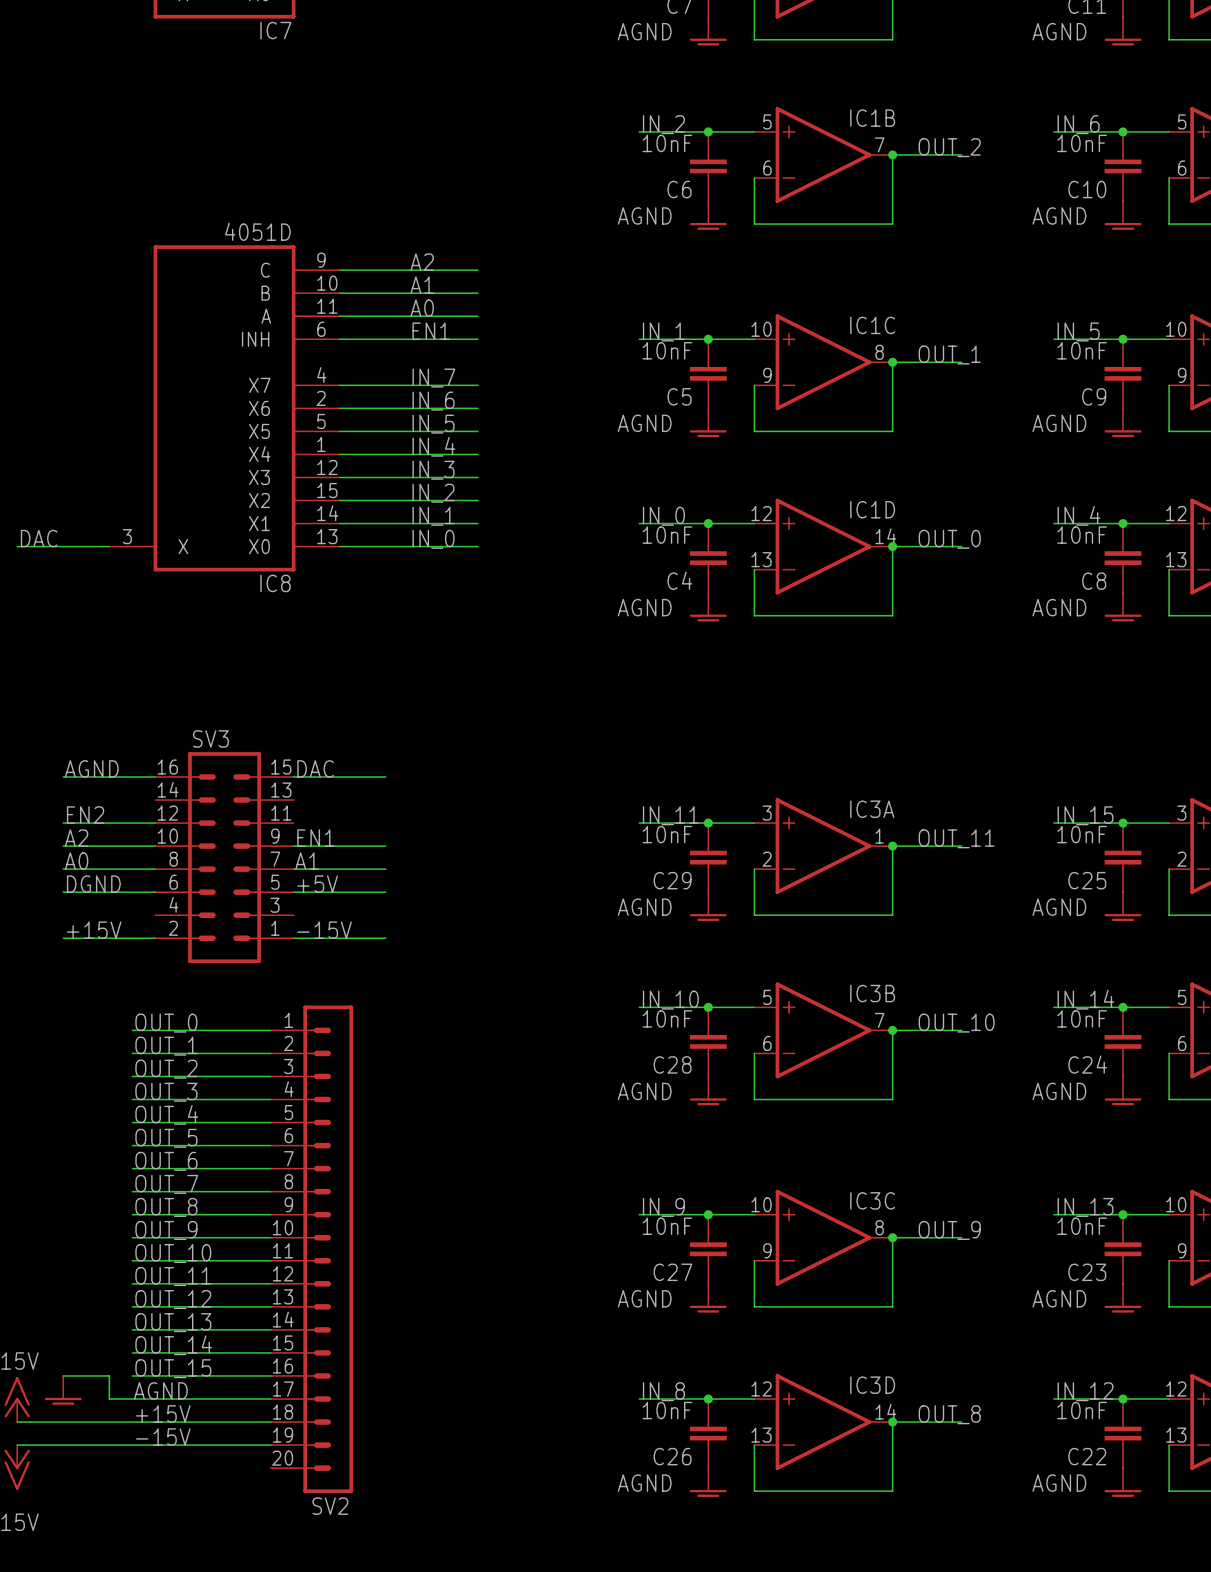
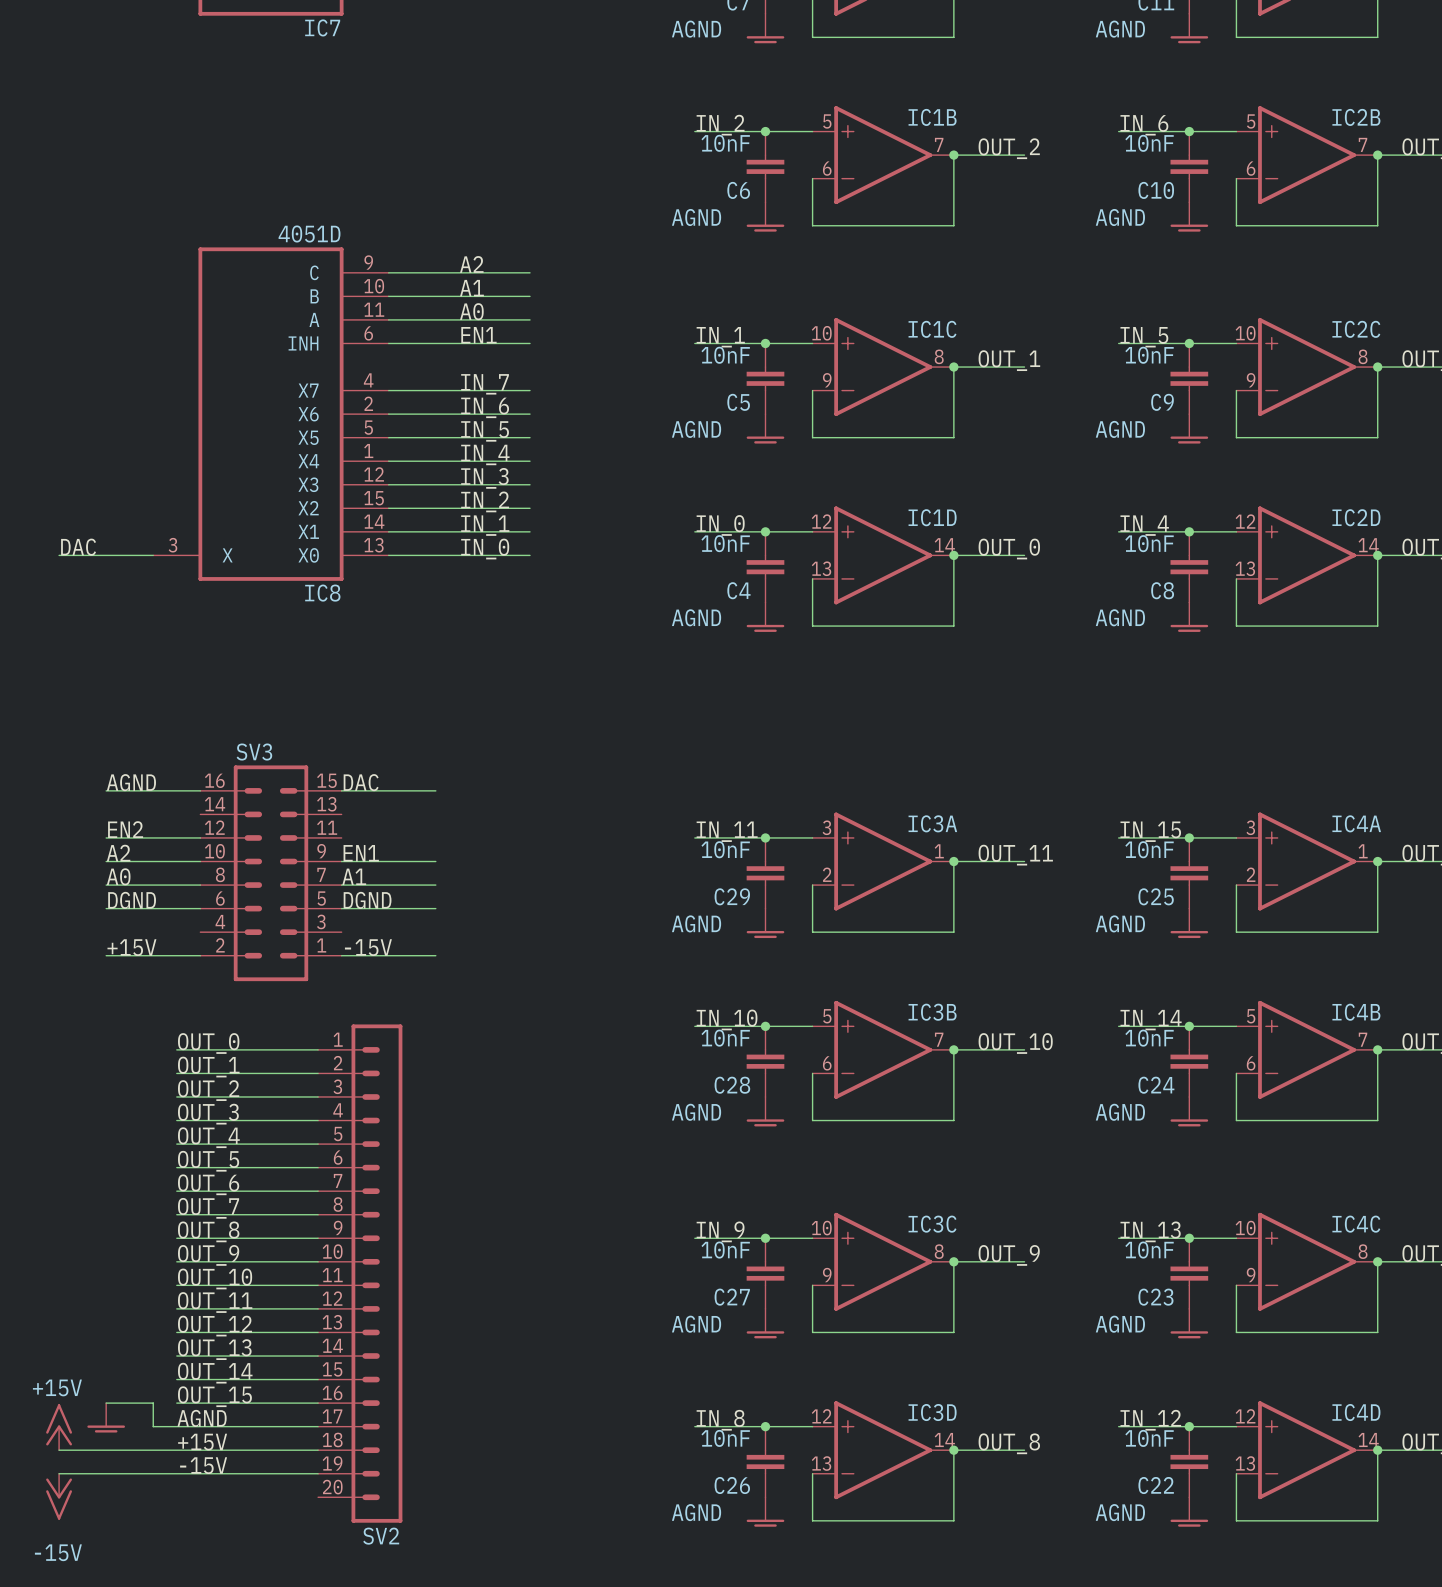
label: +5V (317, 884) -> DGND (367, 900)

